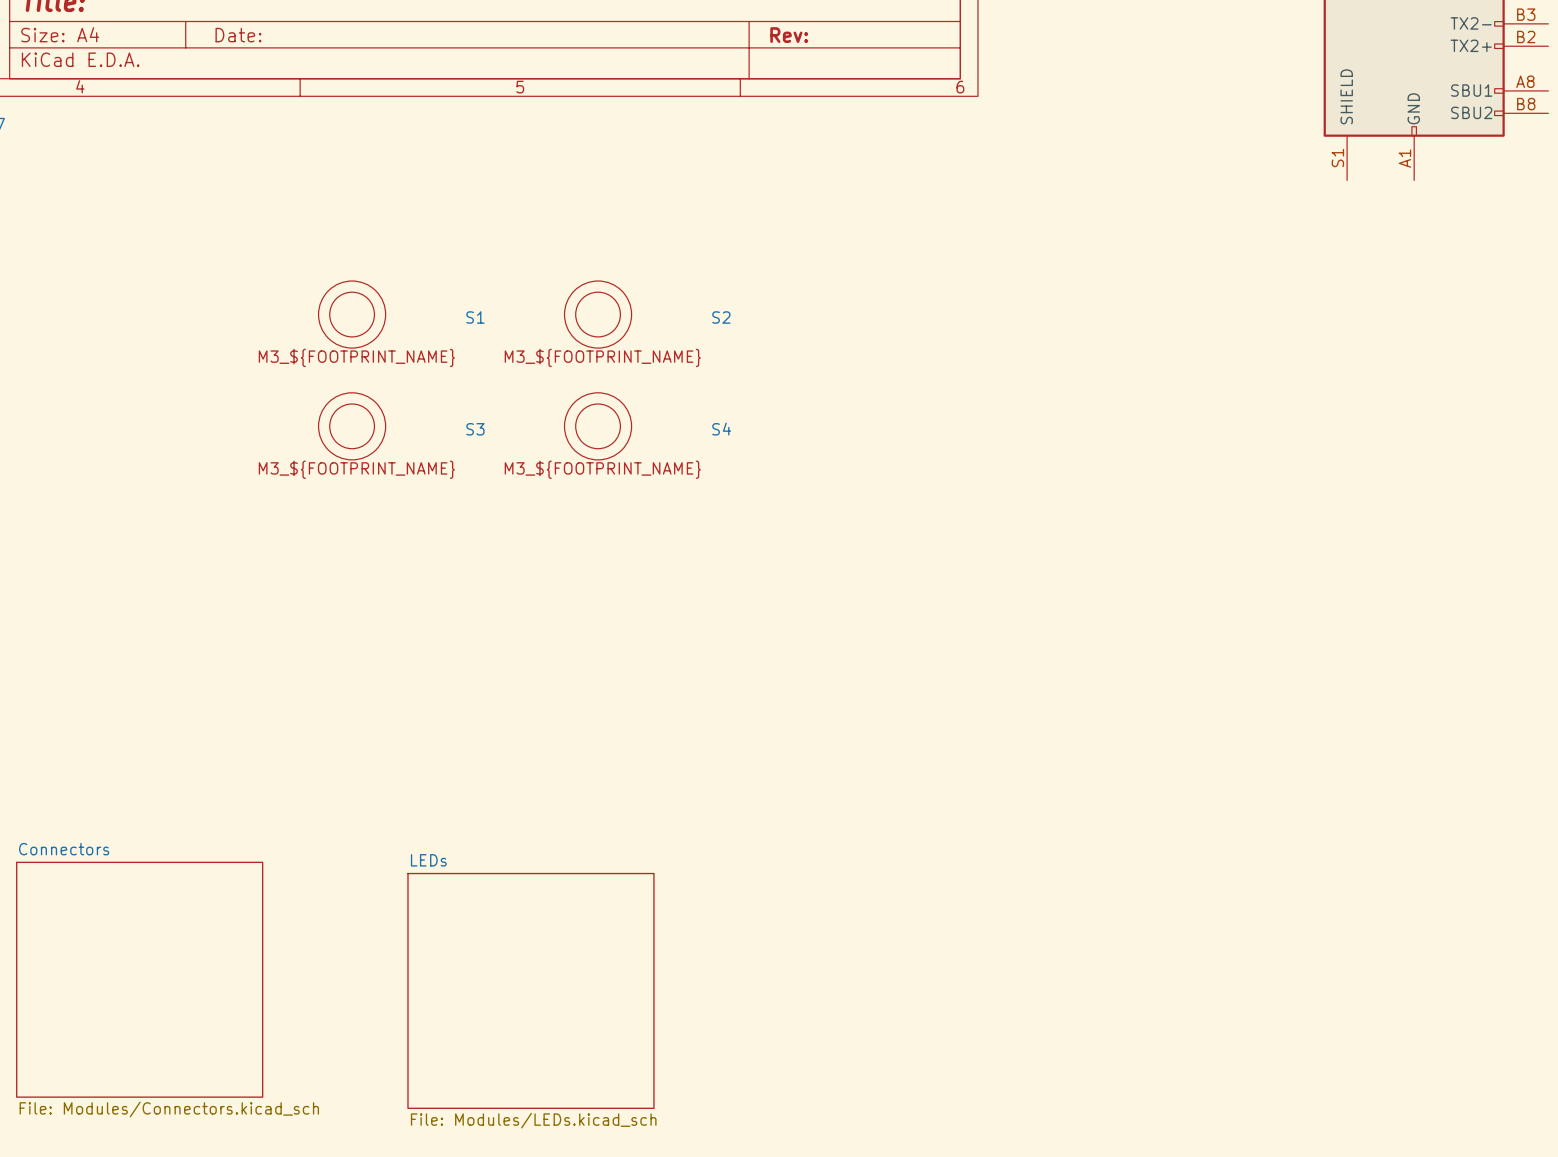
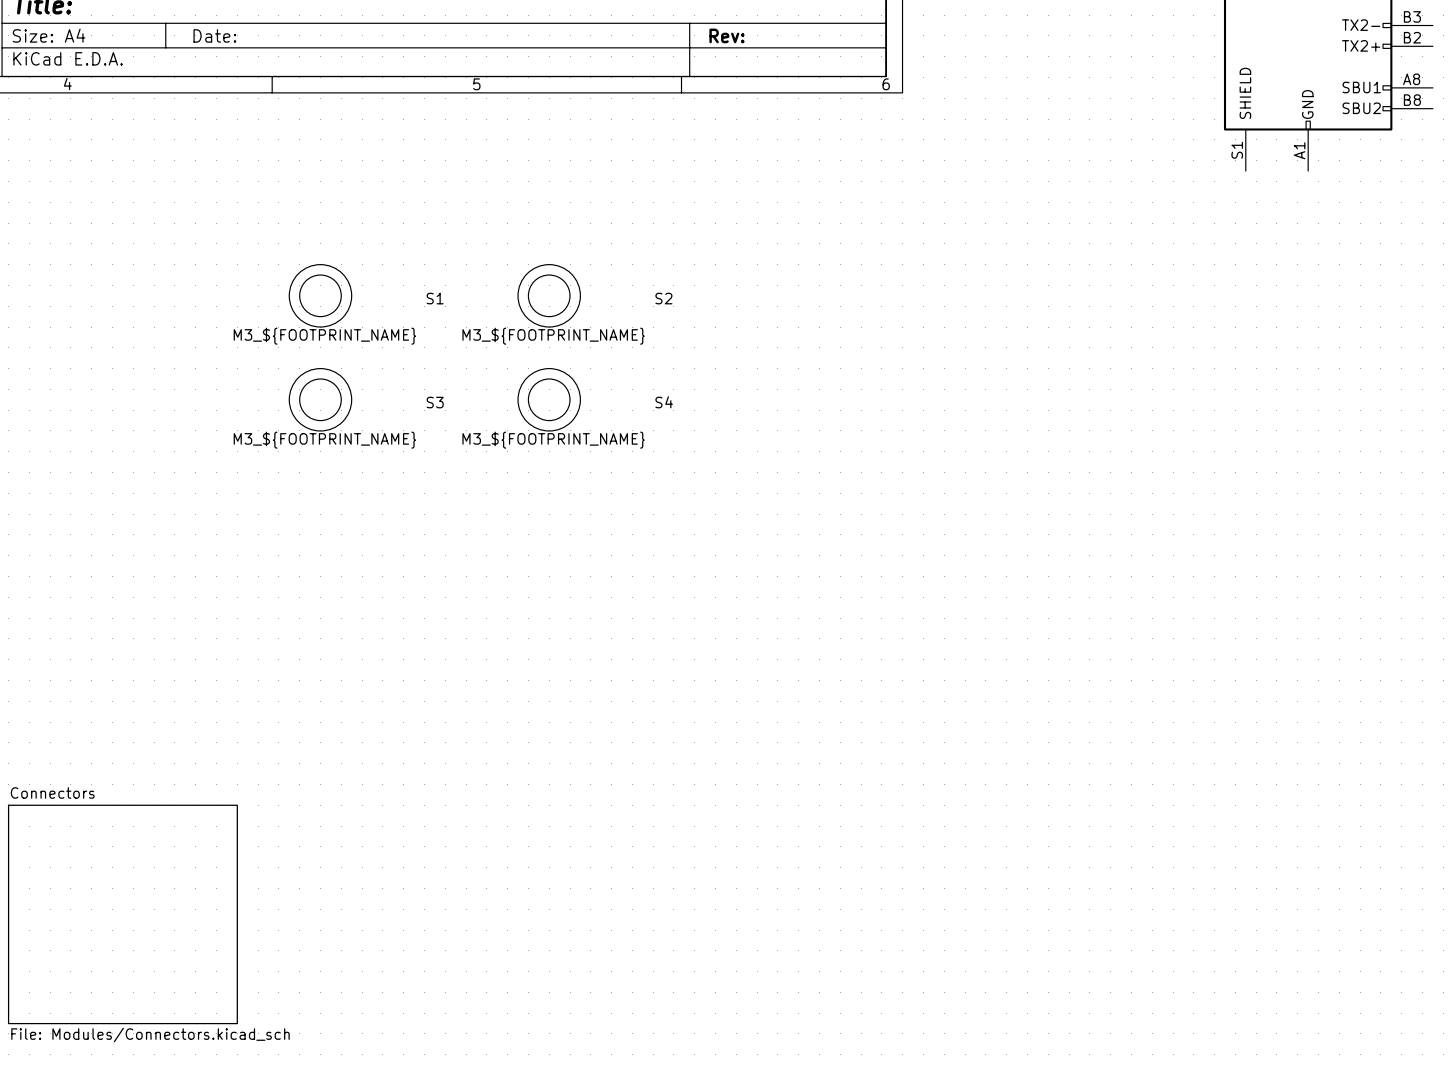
sheet LEDs: File: Modules/LEDs.kicad_sch (530, 990) -> none

